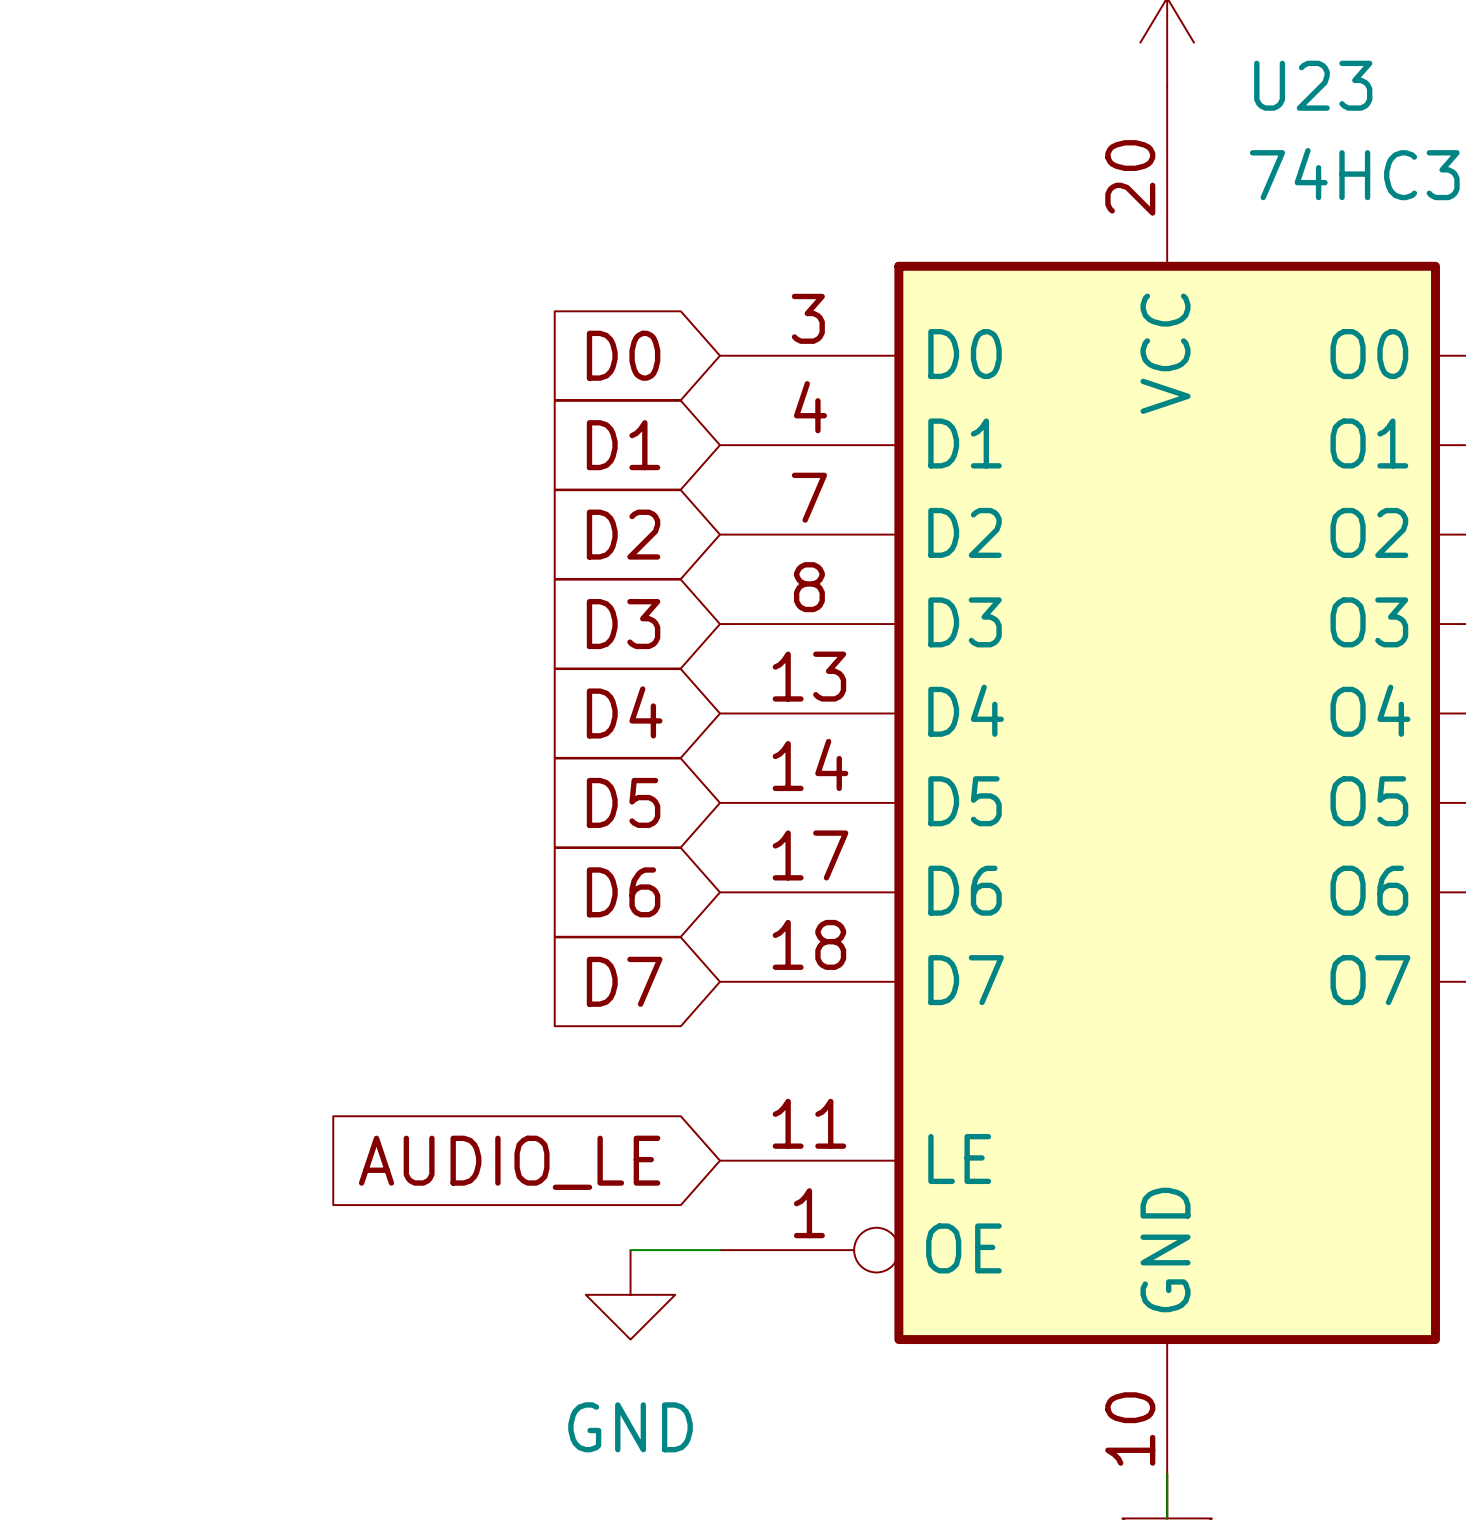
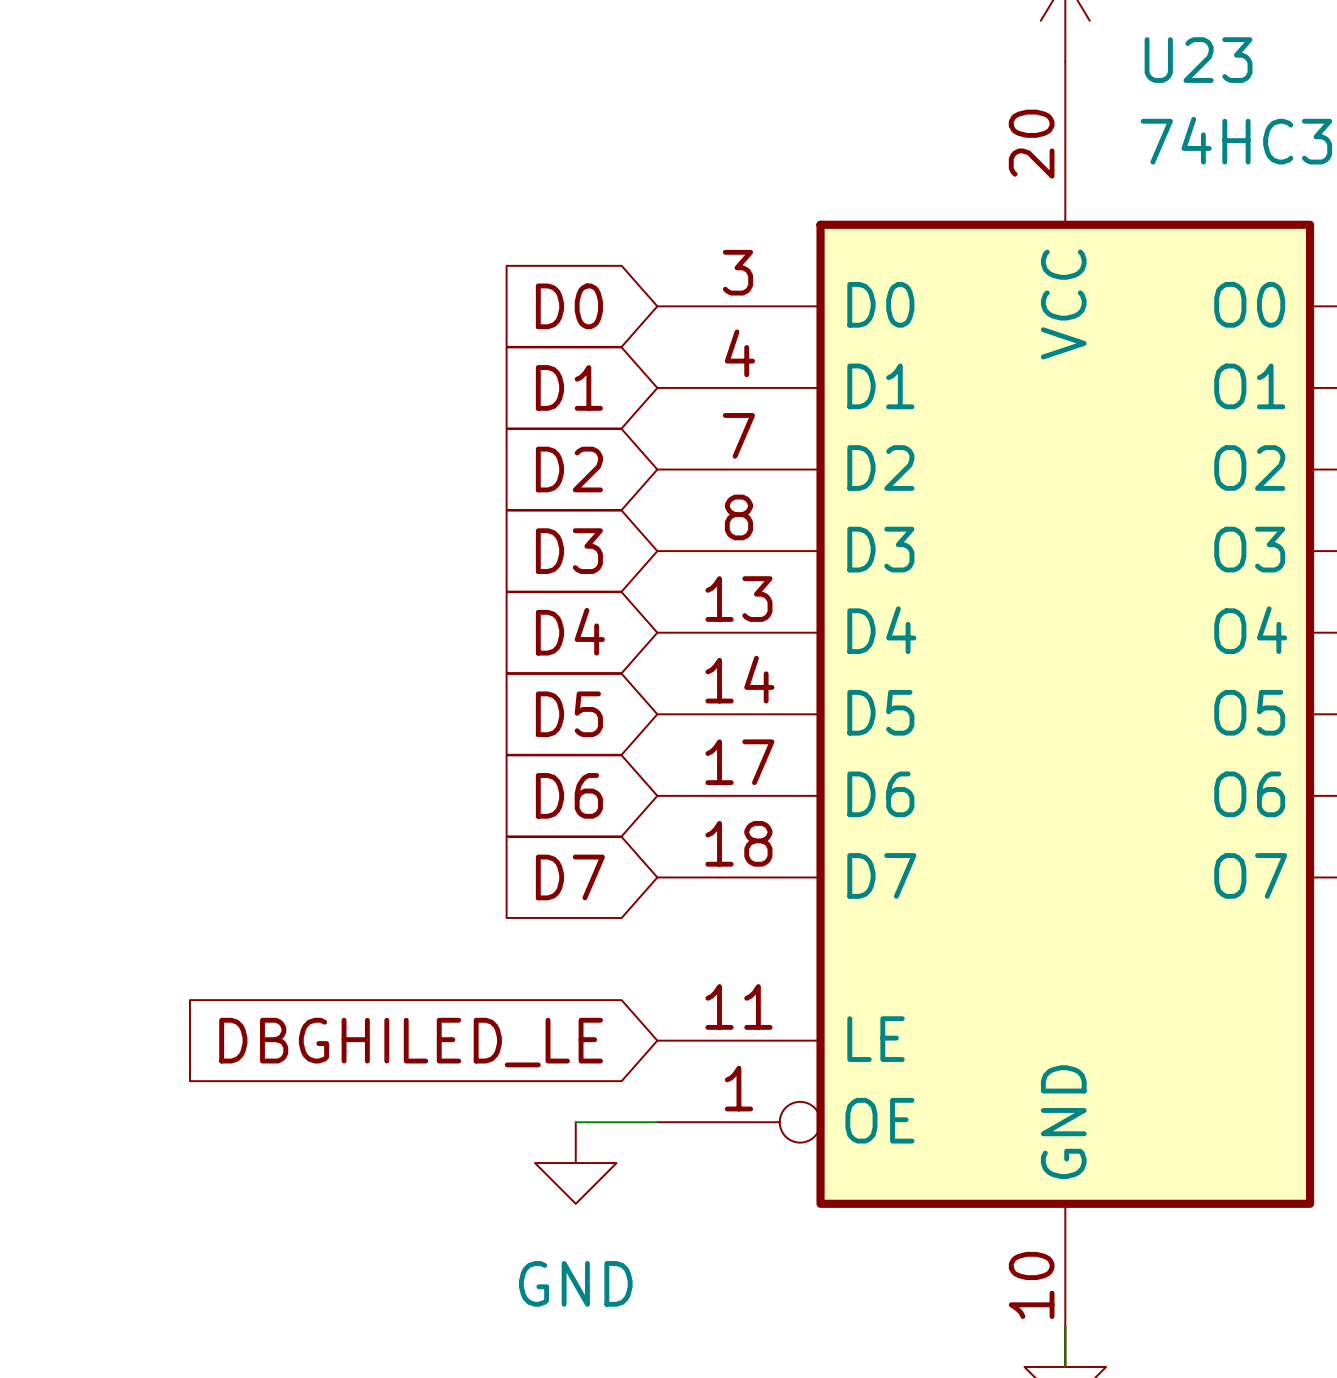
global label: AUDIO_LE (509, 1162) -> DBGHILED_LE (411, 1042)

